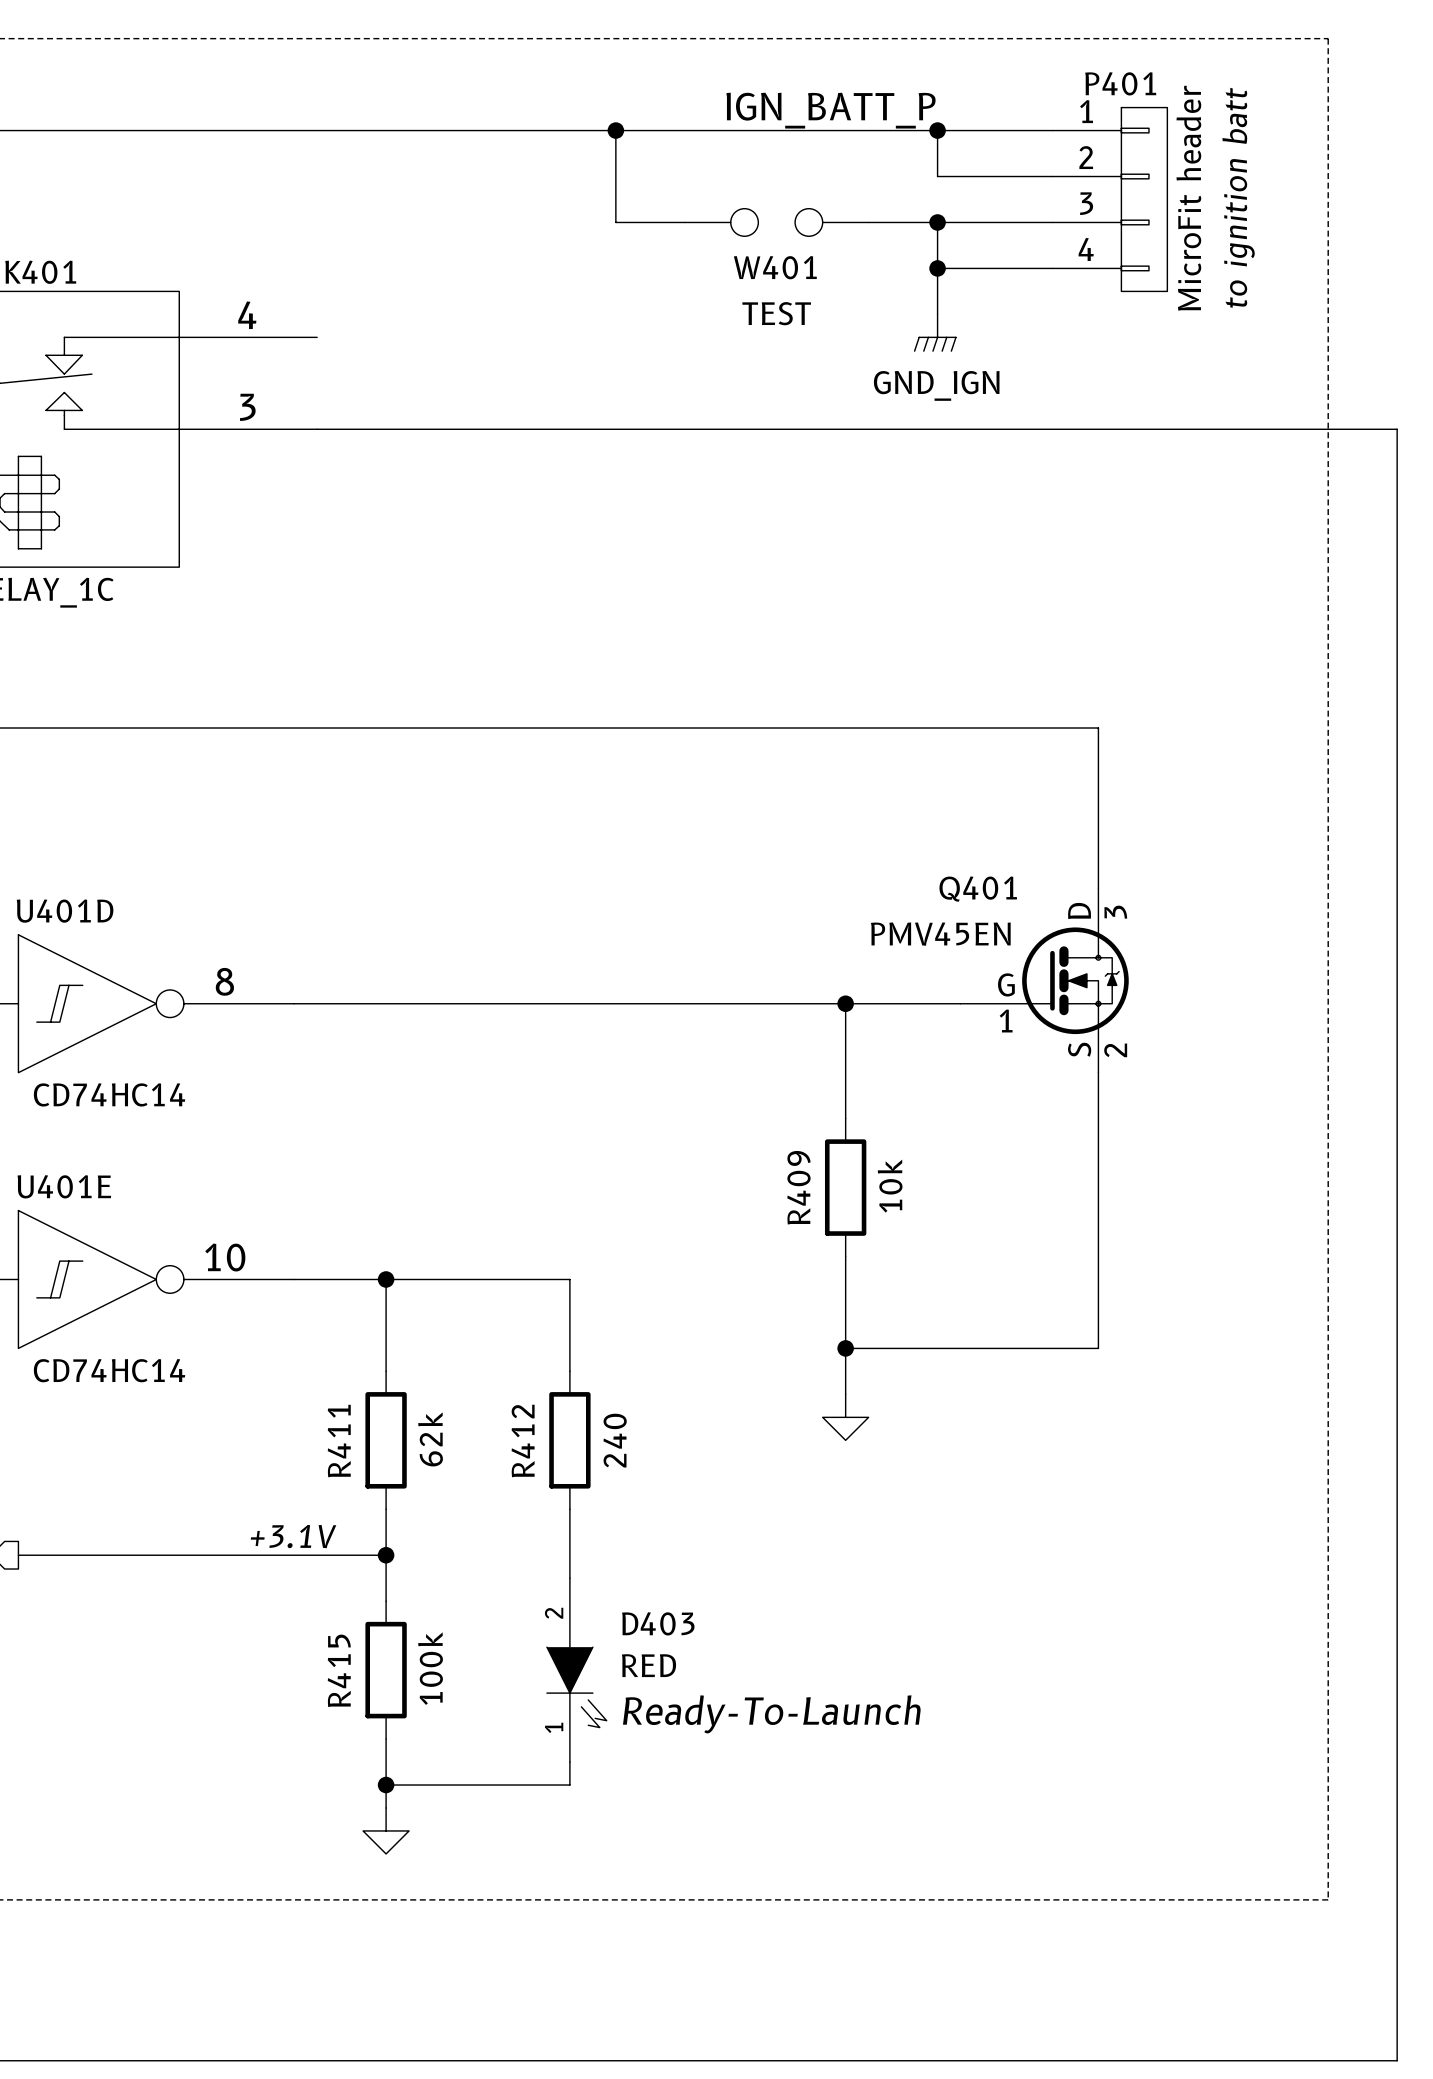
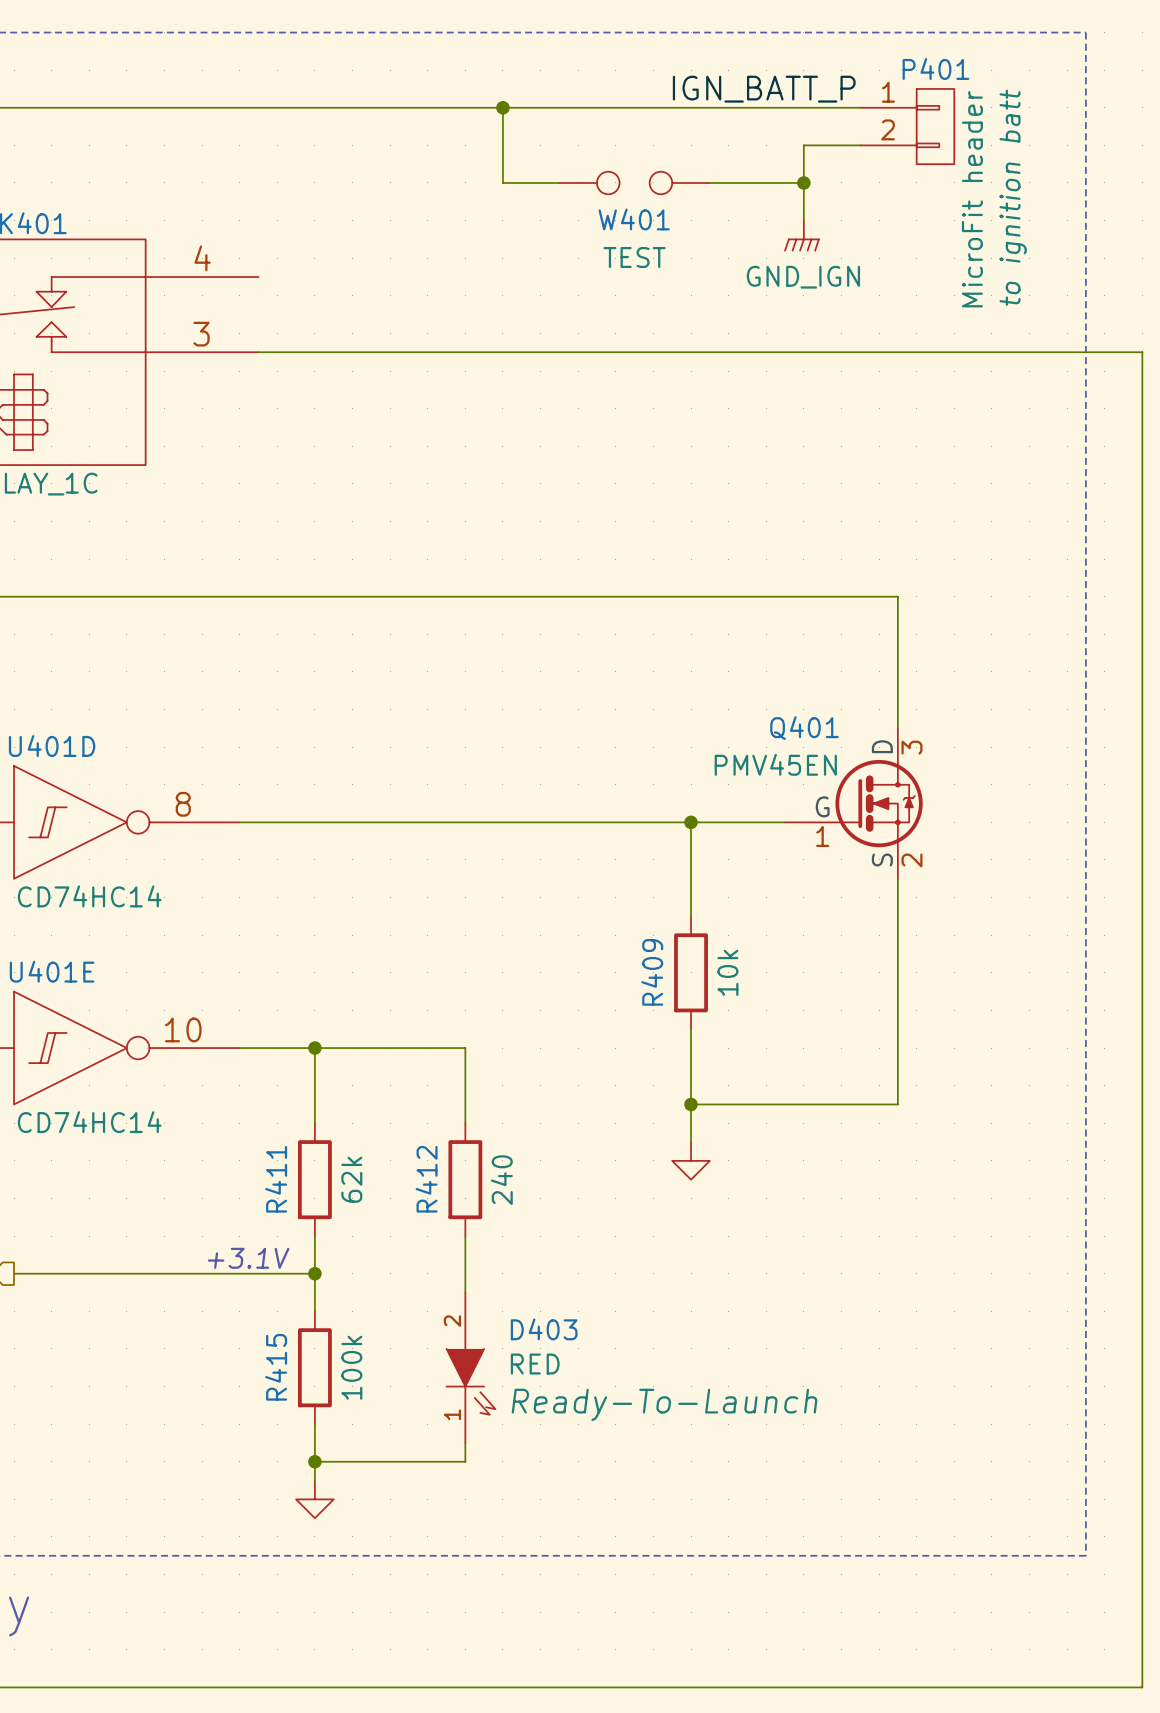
P401 name position: P401 (1120, 83) -> P401 (935, 69)
P401 symbol: [1052, 107, 1168, 292] -> [860, 88, 955, 165]
label position: IGN_BATT_P (831, 110) -> IGN_BATT_P (764, 89)
wire: (937, 130) (937, 176) (983, 176) -> (803, 220) (803, 145)
junction: (937, 130) -> none
P401 text position: to ignition batt (1238, 197) -> to ignition batt (1013, 197)
P401 value position: MicroFit header (1188, 198) -> MicroFit header (972, 199)
wire: (937, 222) (937, 314) -> none
junction: (937, 222) -> none
wire: (983, 222) (1052, 222) -> none
junction: none -> (803, 182)
wire: (937, 268) (1052, 268) -> none
junction: (937, 268) -> none
power symbol position: GND_IGN (935, 332) -> GND_IGN (801, 235)

